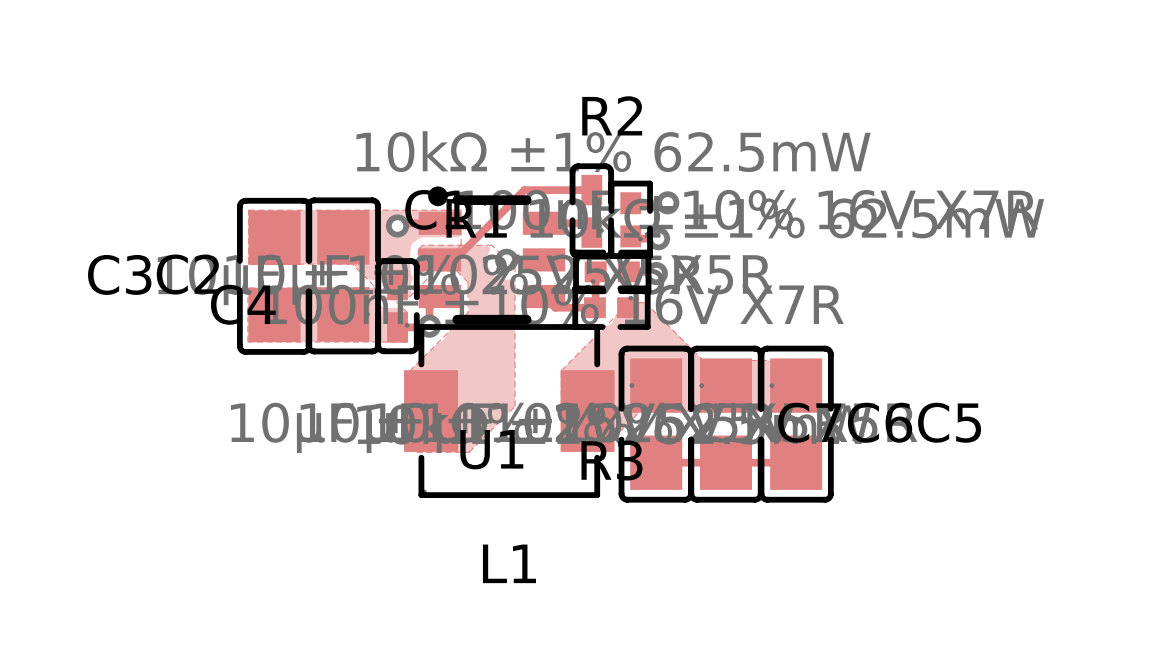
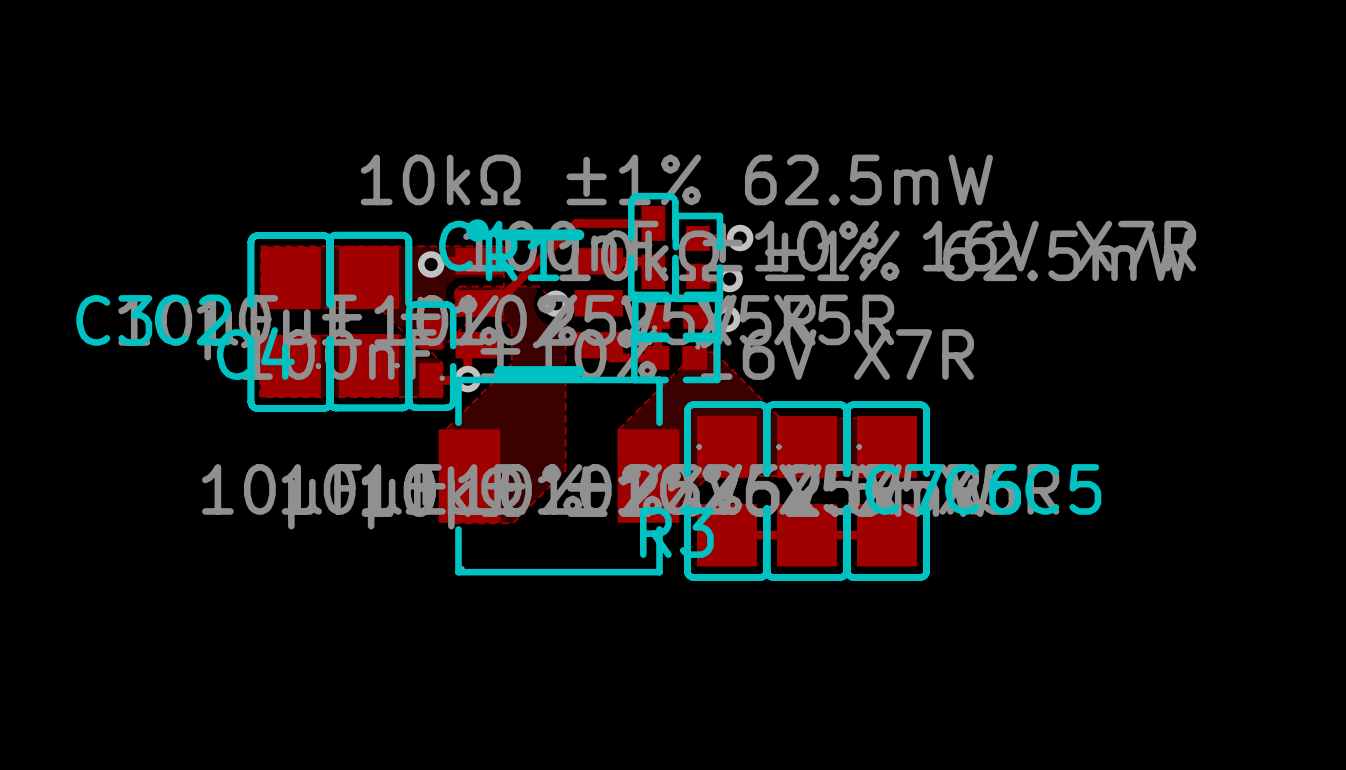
R2 name: R2 (612, 115) -> none
part: none -> (369, 321)
part: none -> (290, 322)
part: none -> (726, 491)
part: none -> (806, 491)
part: none -> (886, 491)
U1 name: U1 (491, 449) -> none
L1 name: L1 (509, 563) -> none

